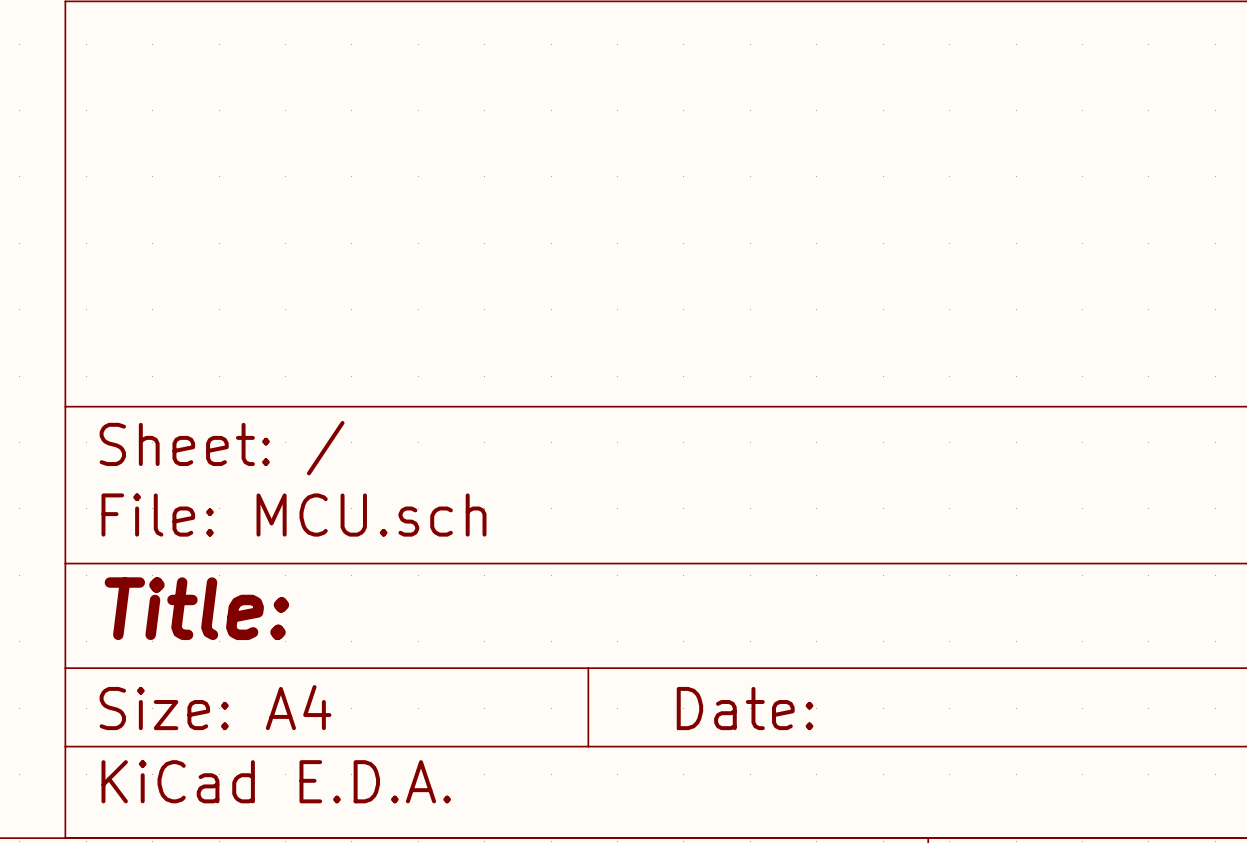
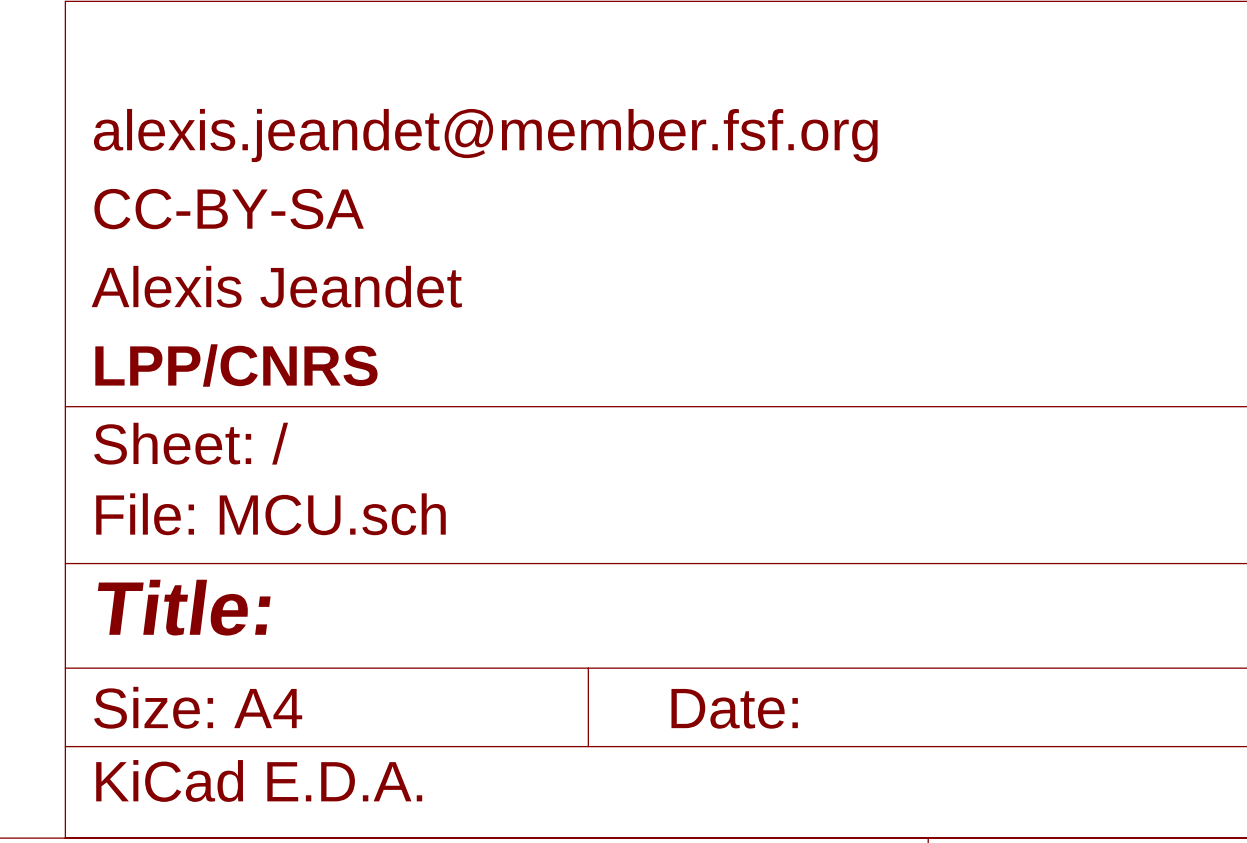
title block: none -> alexis.jeandet@member.fsf.org (485, 135)
title block: none -> CC-BY-SA (229, 209)
title block: none -> Alexis Jeandet (276, 286)
title block: none -> LPP/CNRS (236, 365)

